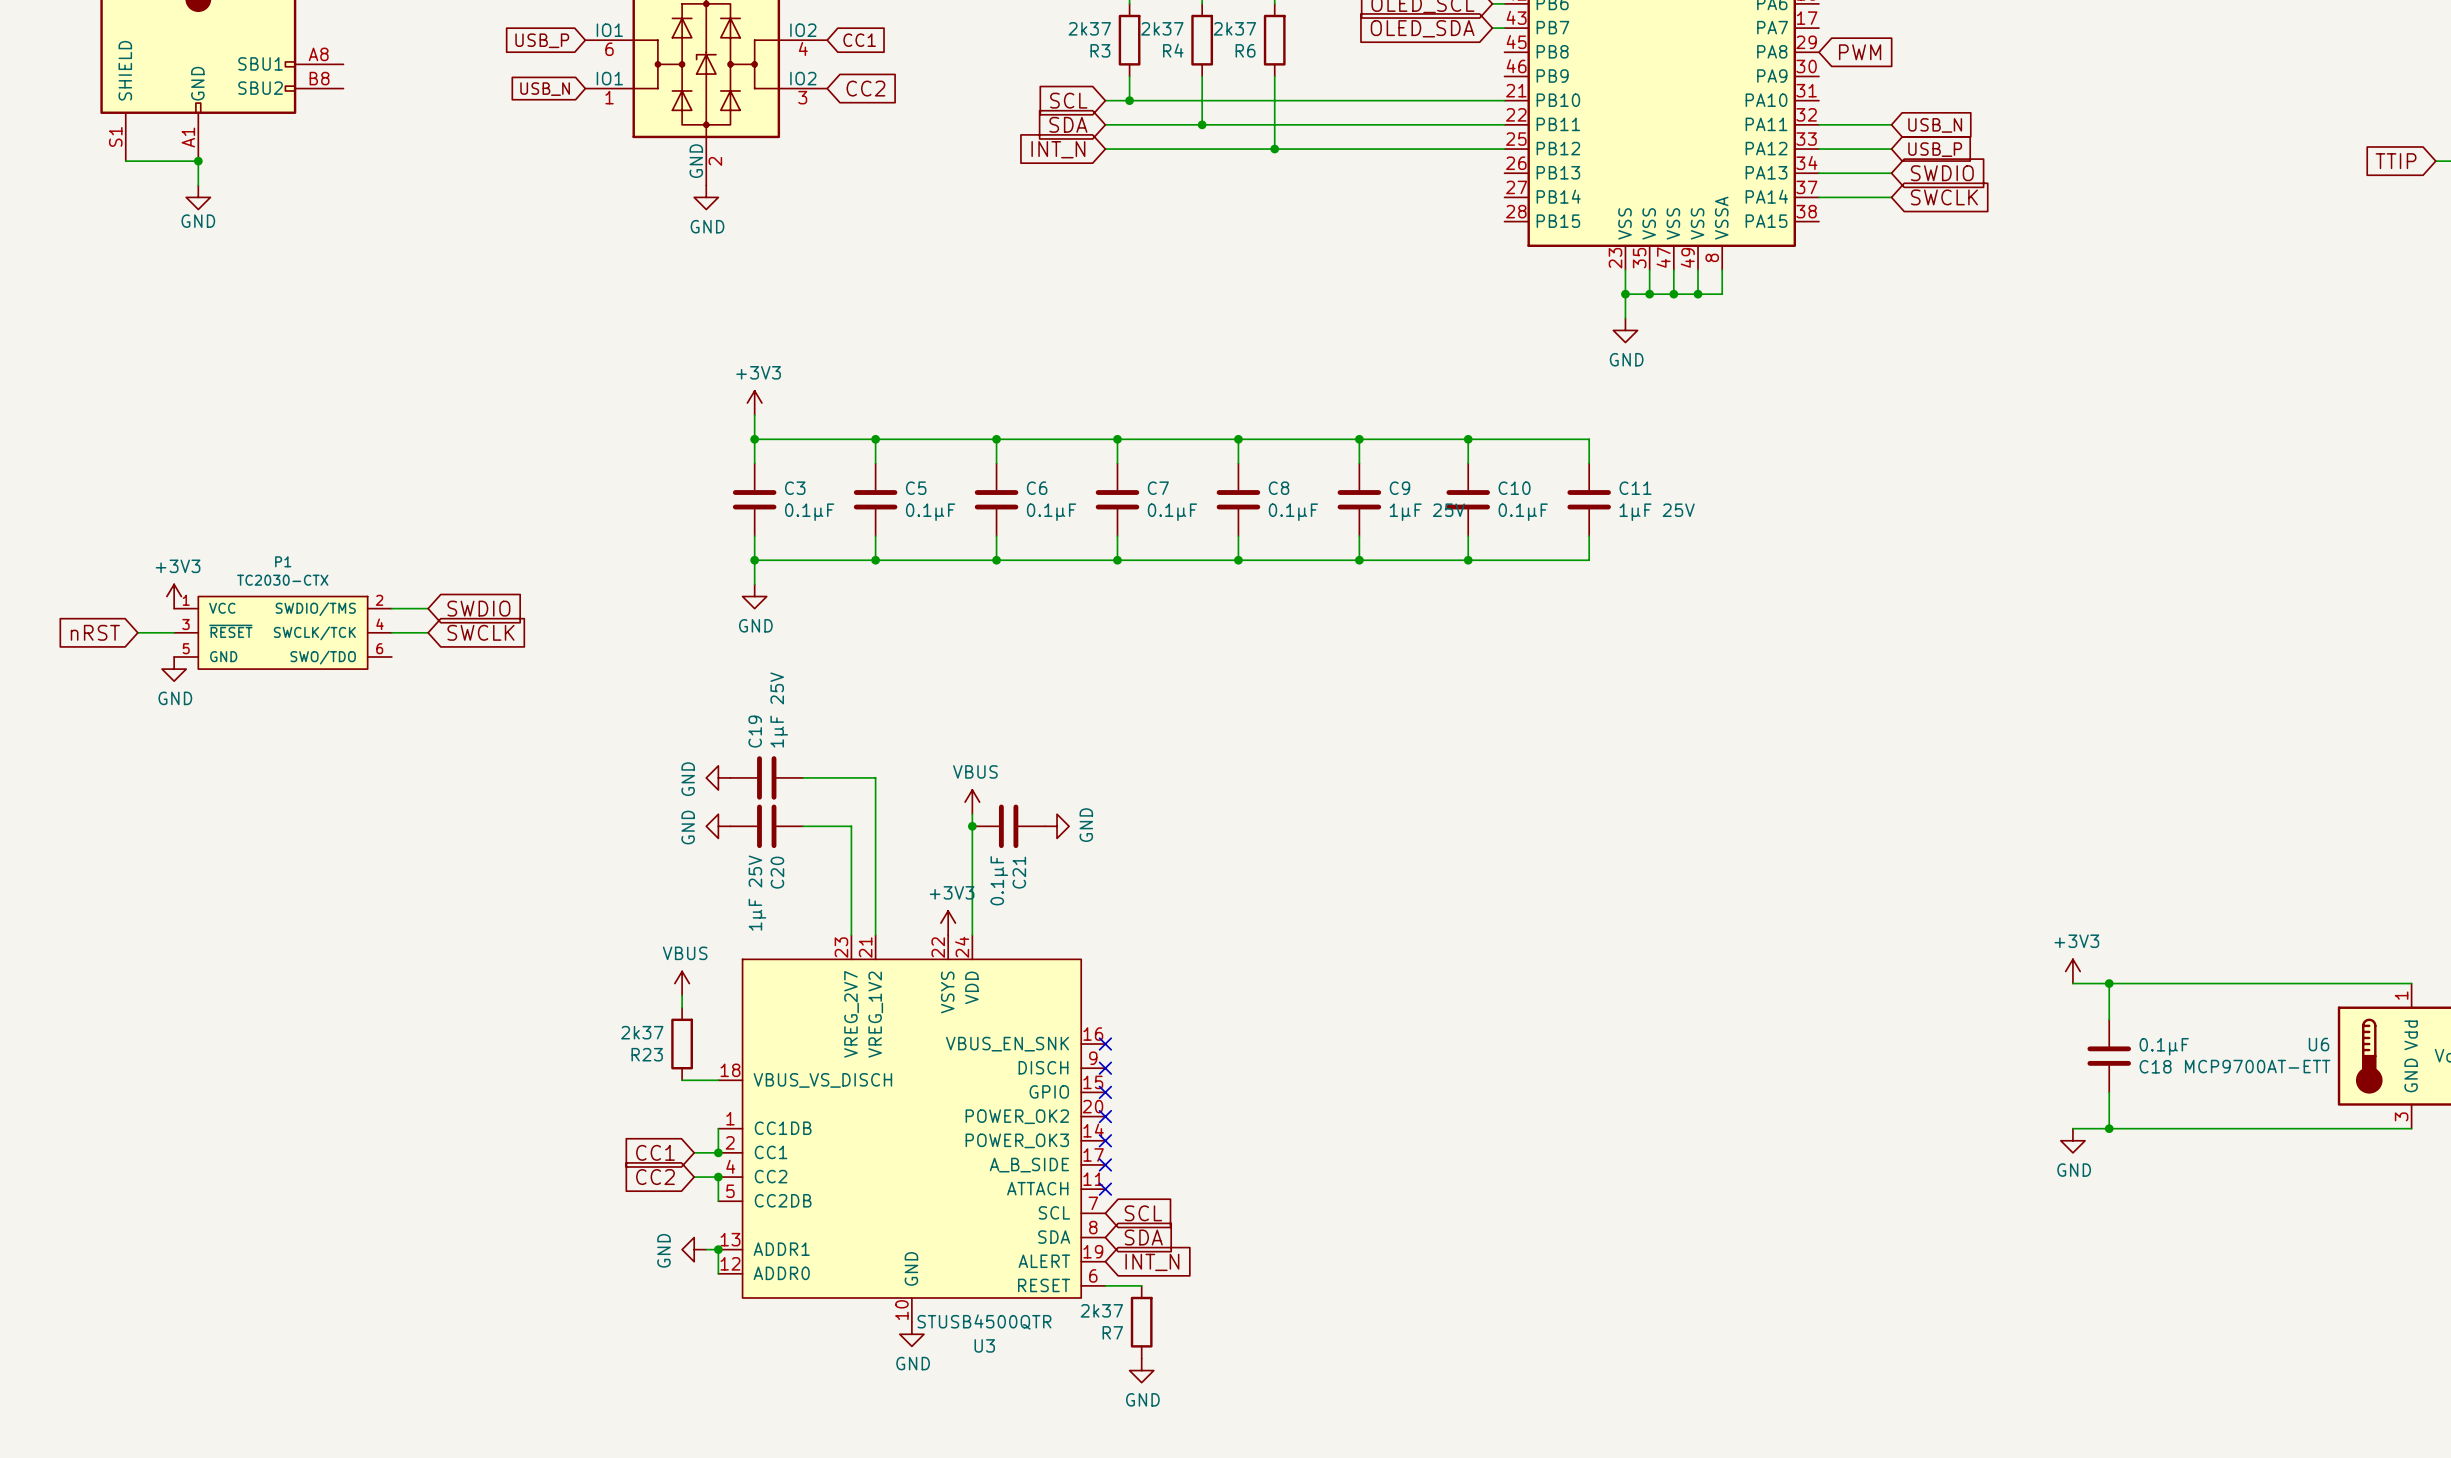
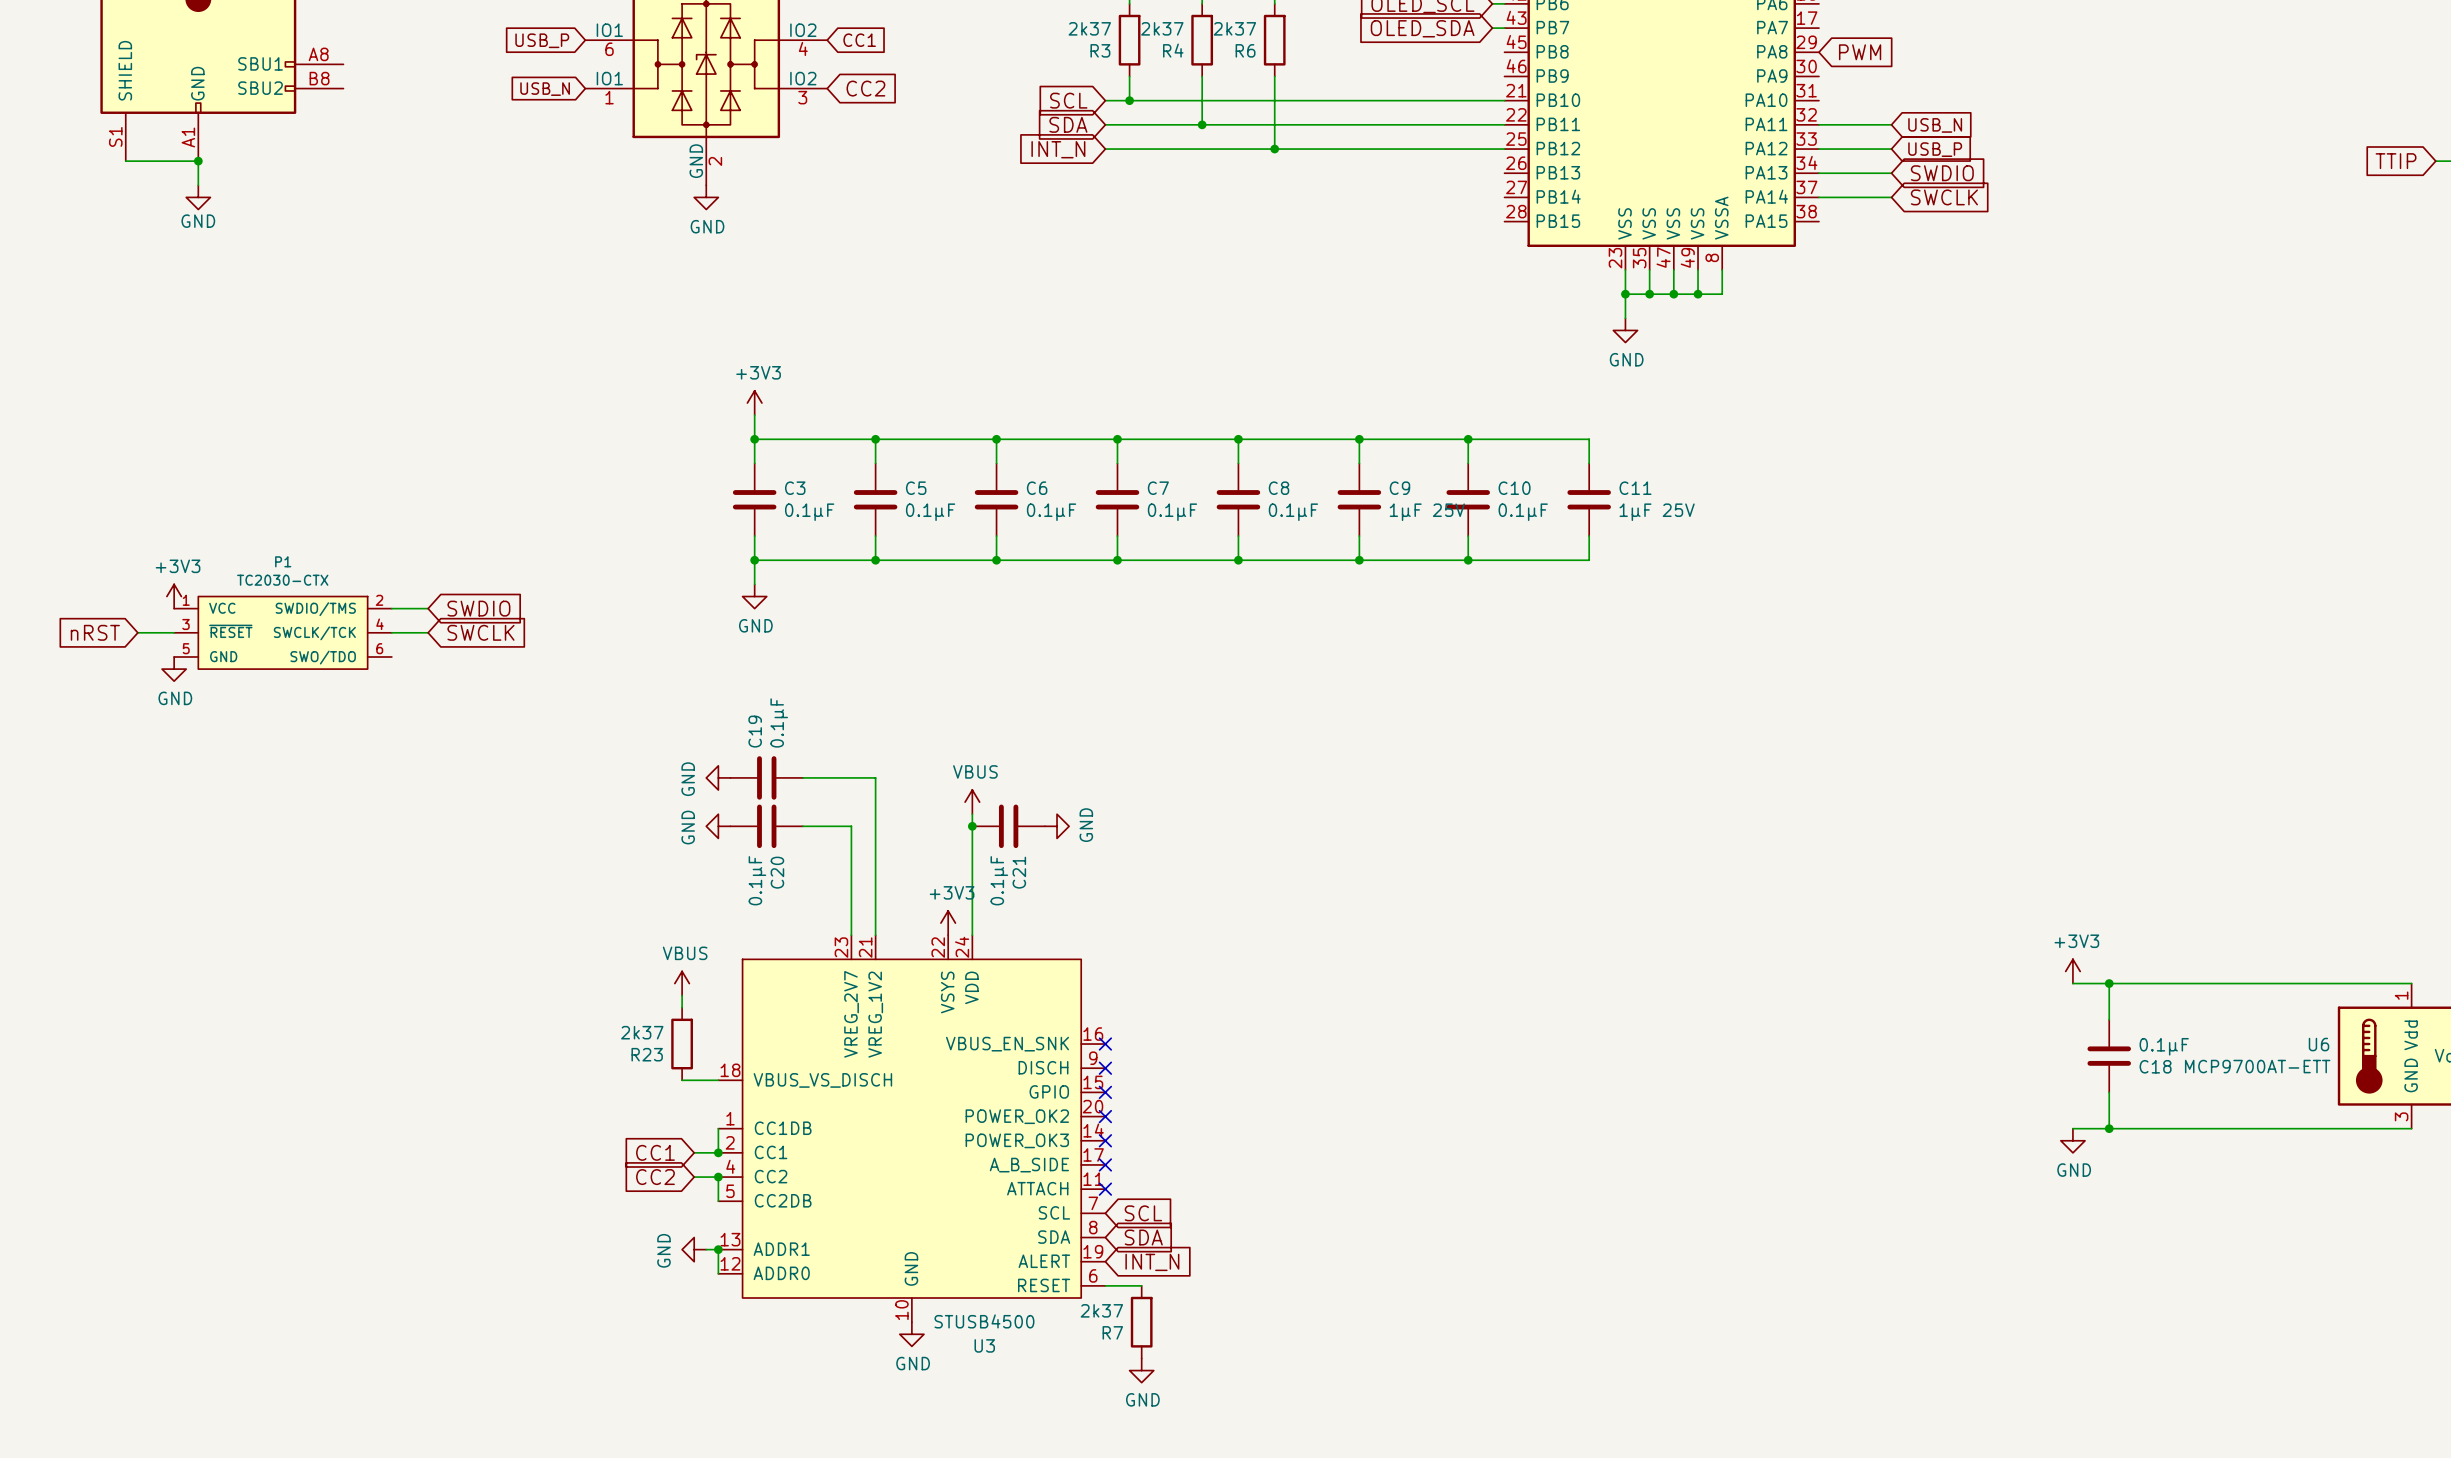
C19 value: 1μF 25V (779, 710) -> 0.1μF (779, 722)
C20 value: 1μF 25V (757, 893) -> 0.1μF (757, 880)
U3 value: STUSB4500QTR (984, 1322) -> STUSB4500 (984, 1321)

